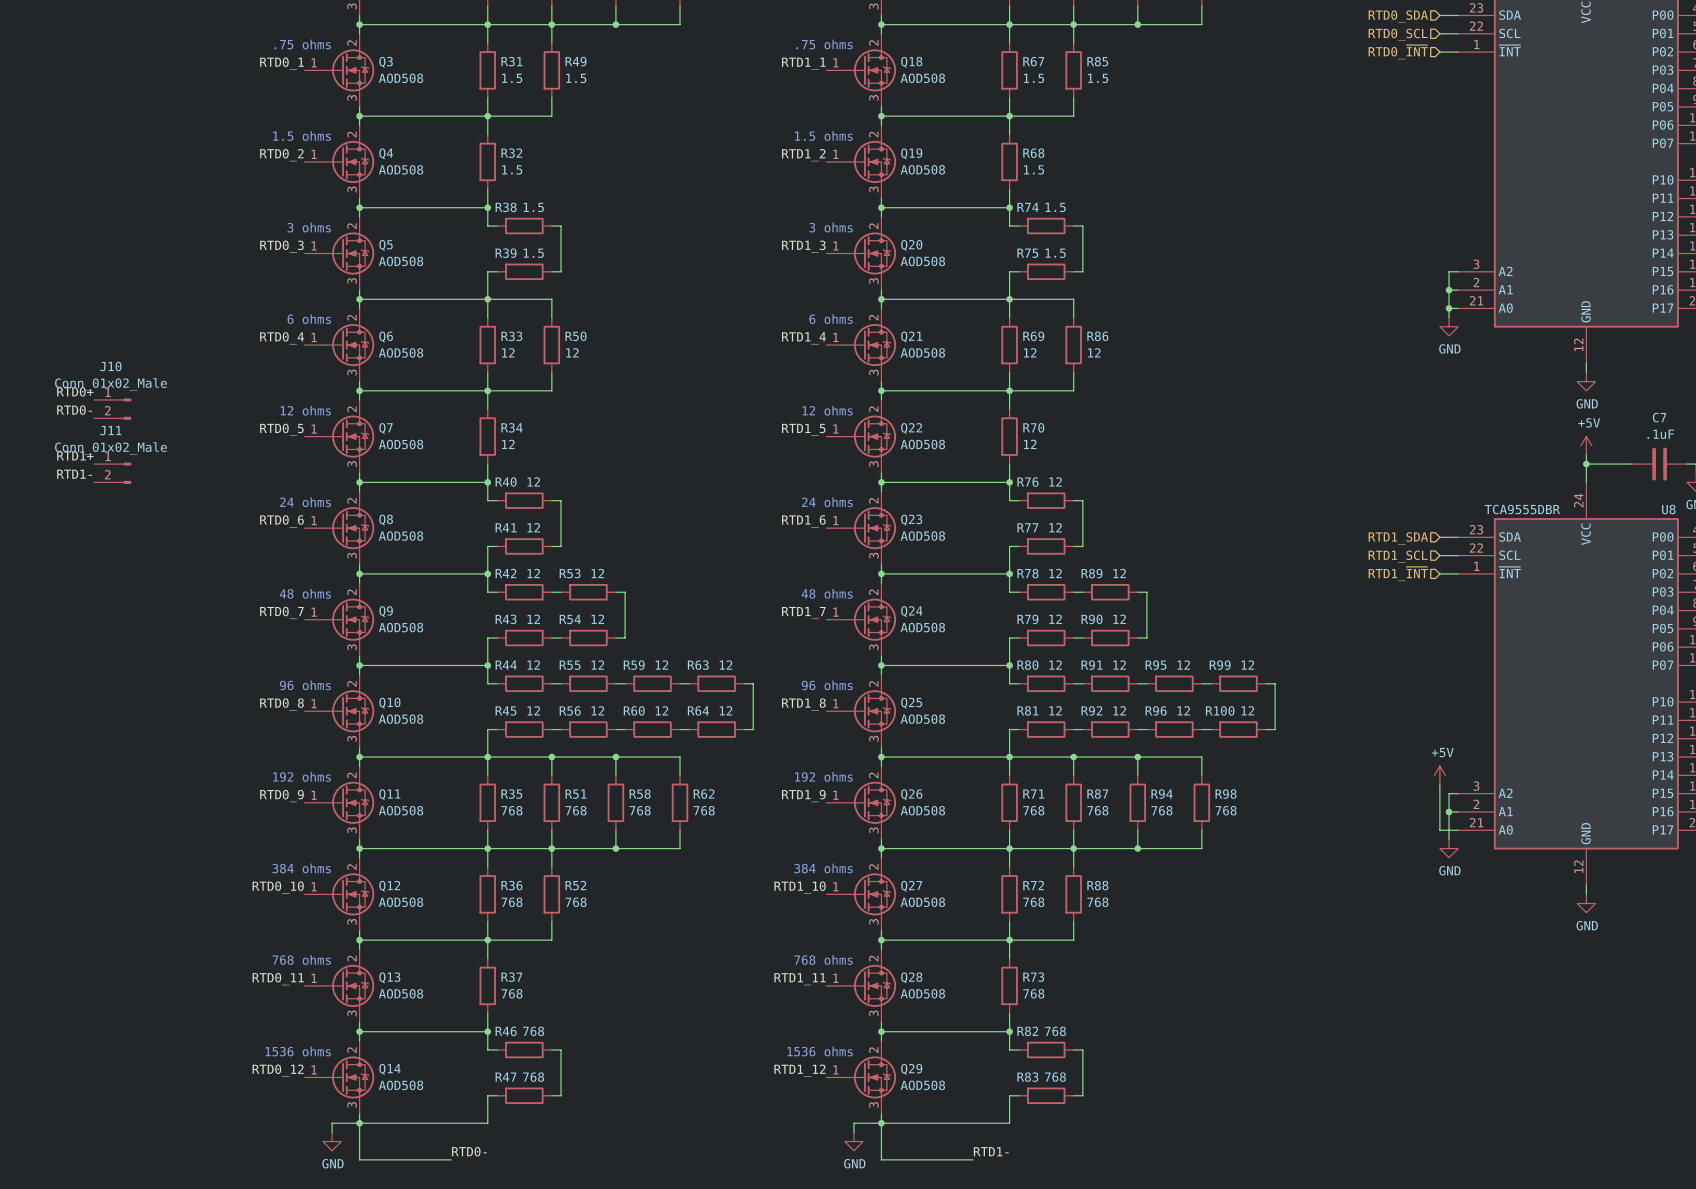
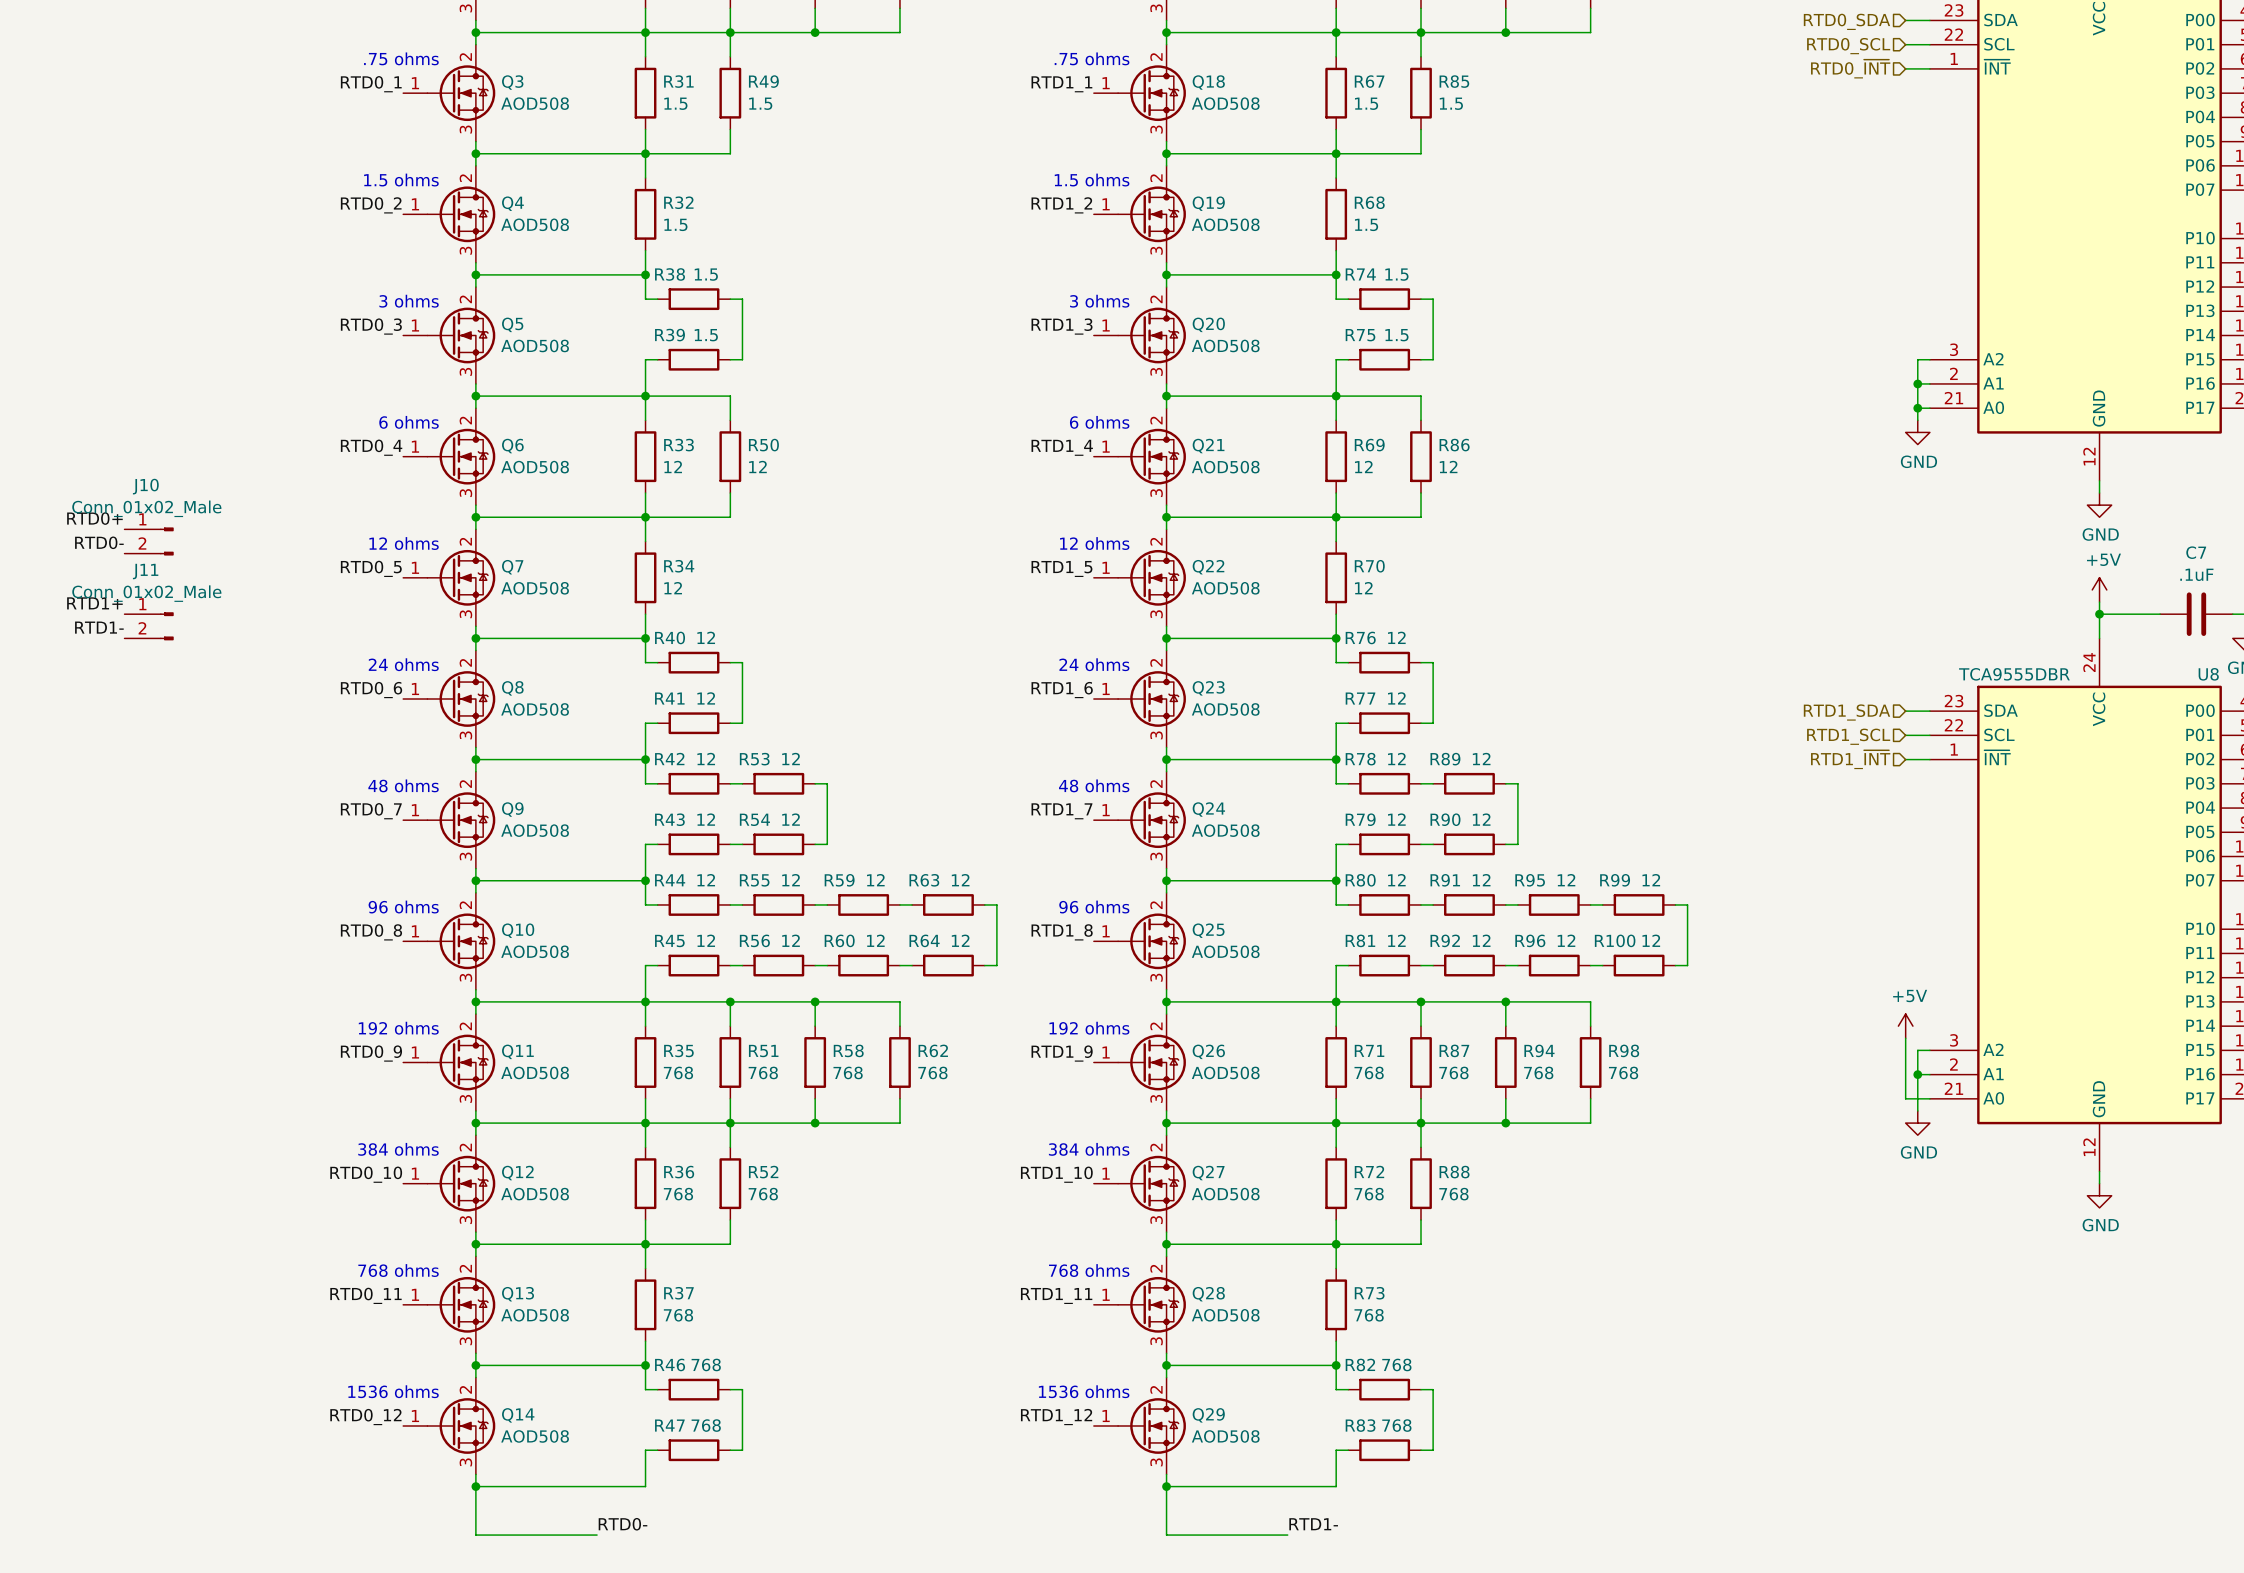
wire: (359, 1123) (332, 1123) (332, 1132) -> none
wire: (881, 1123) (853, 1123) (853, 1132) -> none
power symbol: GND (332, 1141) -> none
power symbol: GND (853, 1141) -> none

